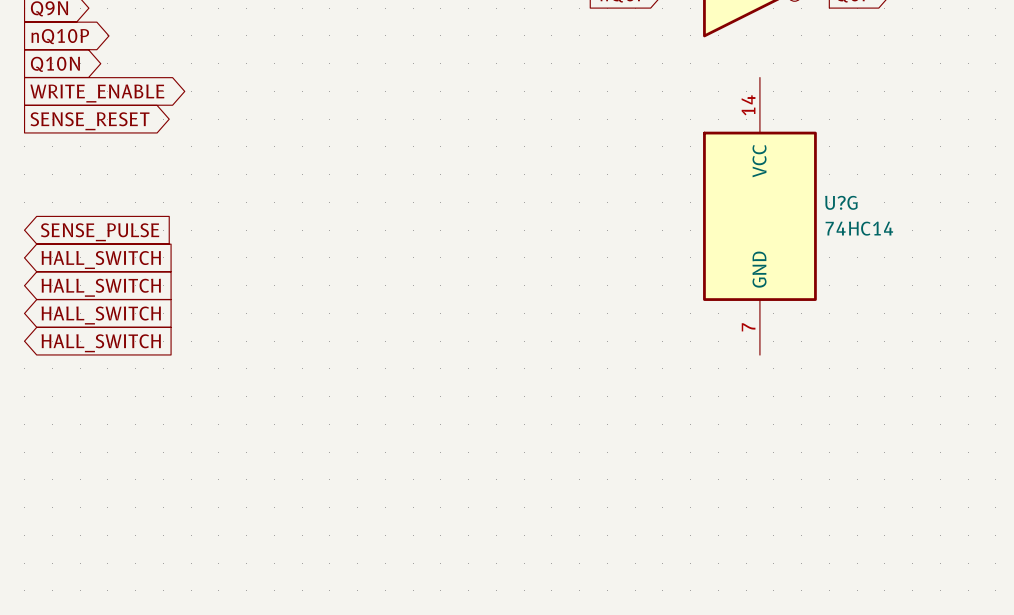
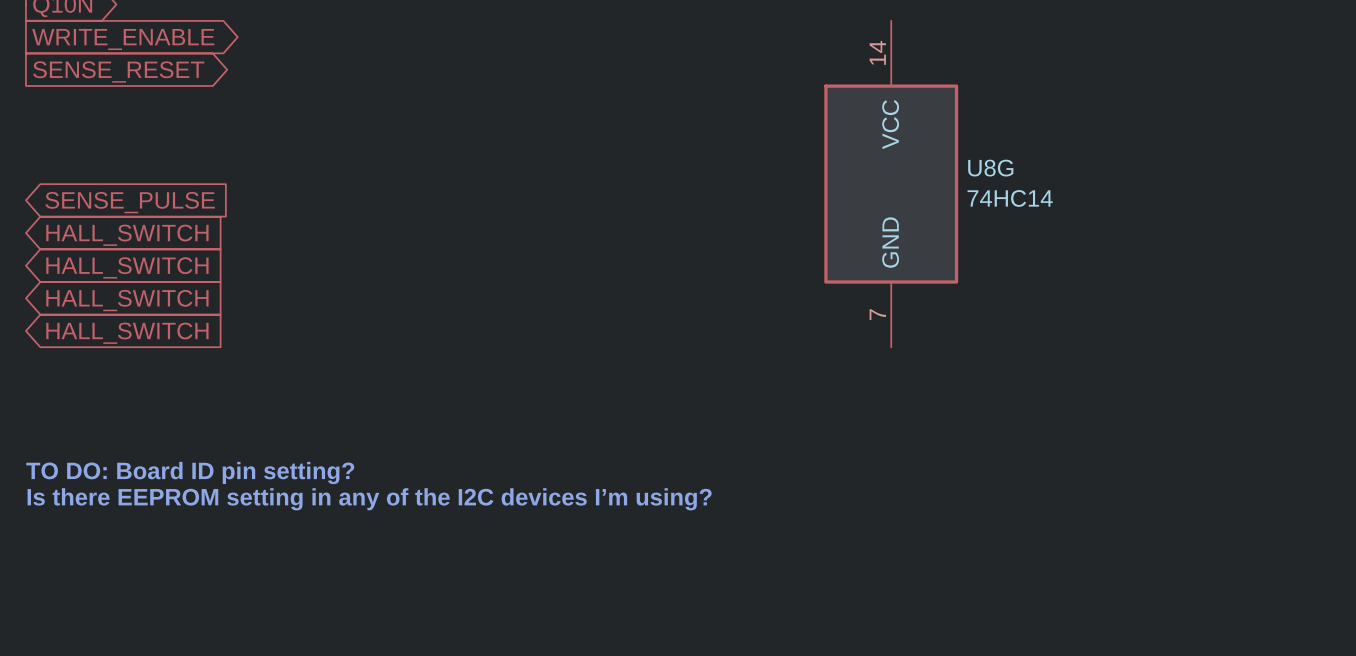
U?G name: U?G (841, 202) -> U8G (990, 168)
text: none -> TO DO: Board ID pin setting? (190, 472)
text: none -> Is there EEPROM setting in any of the I2C devices I’m using? (369, 499)

